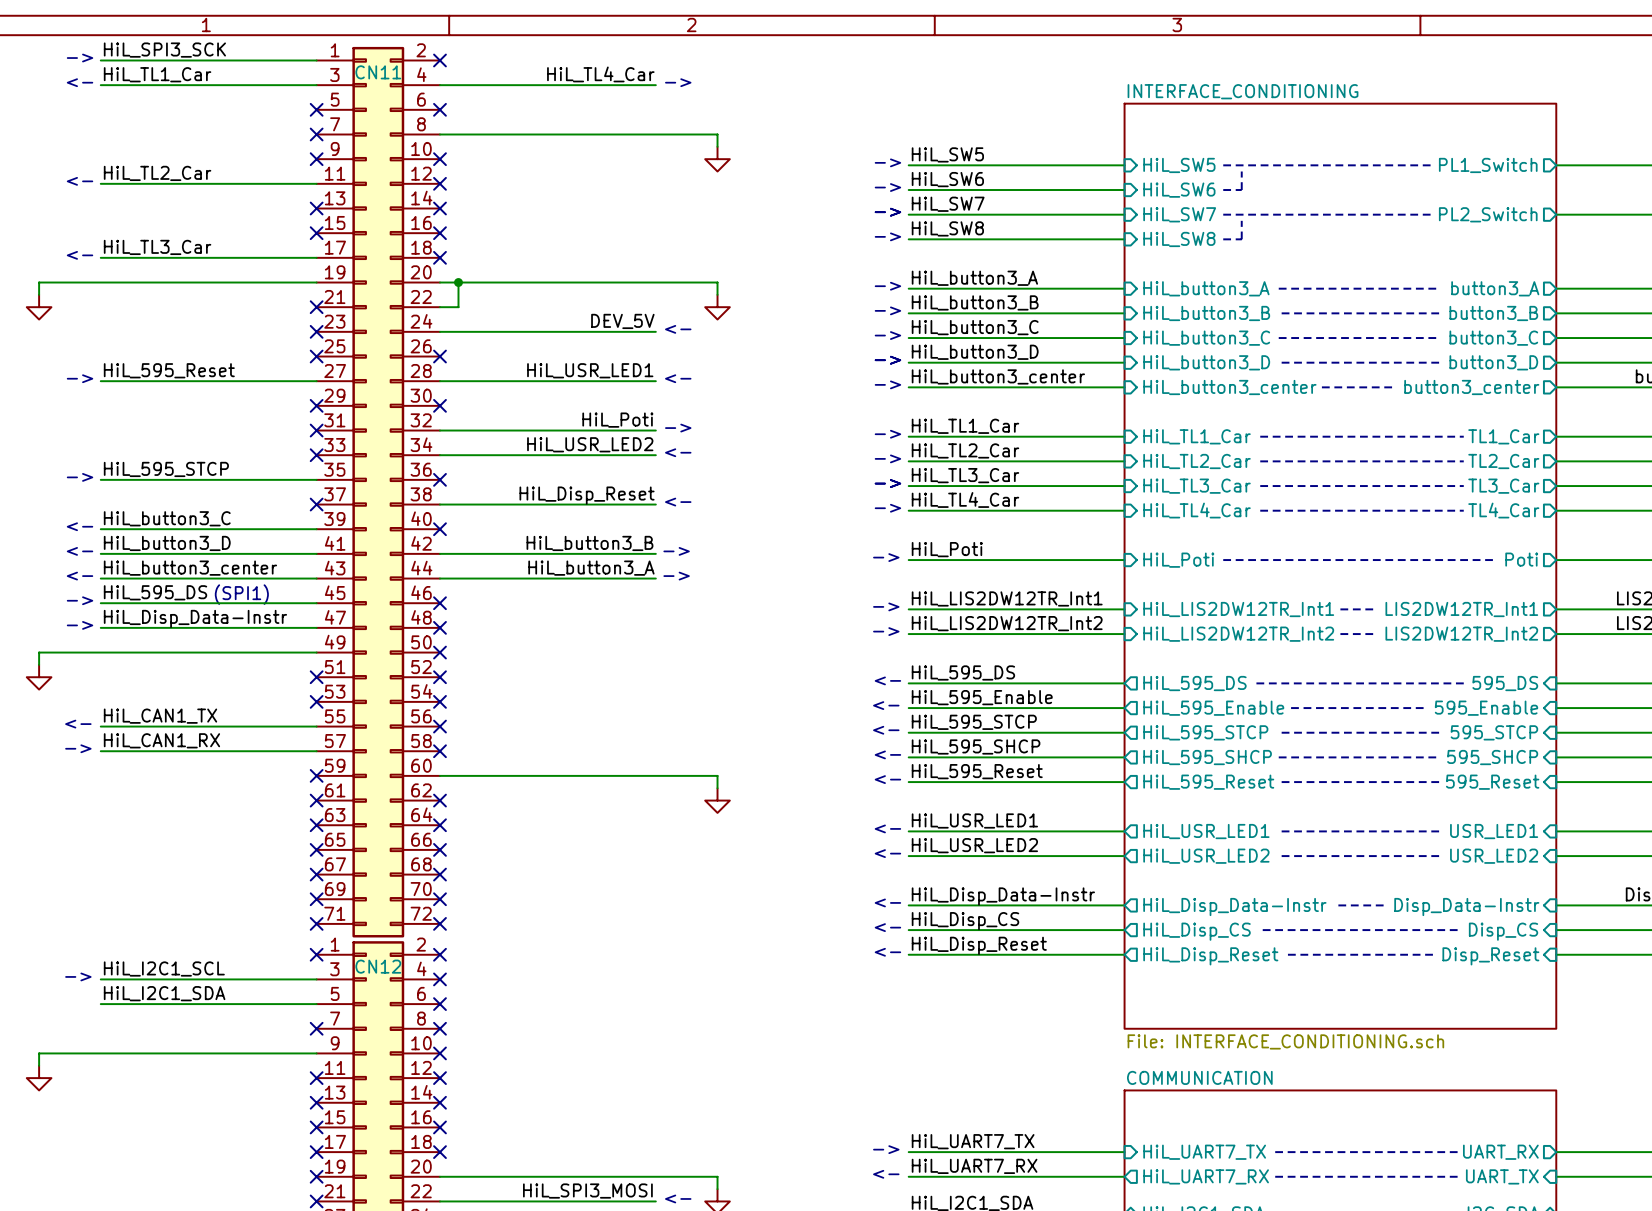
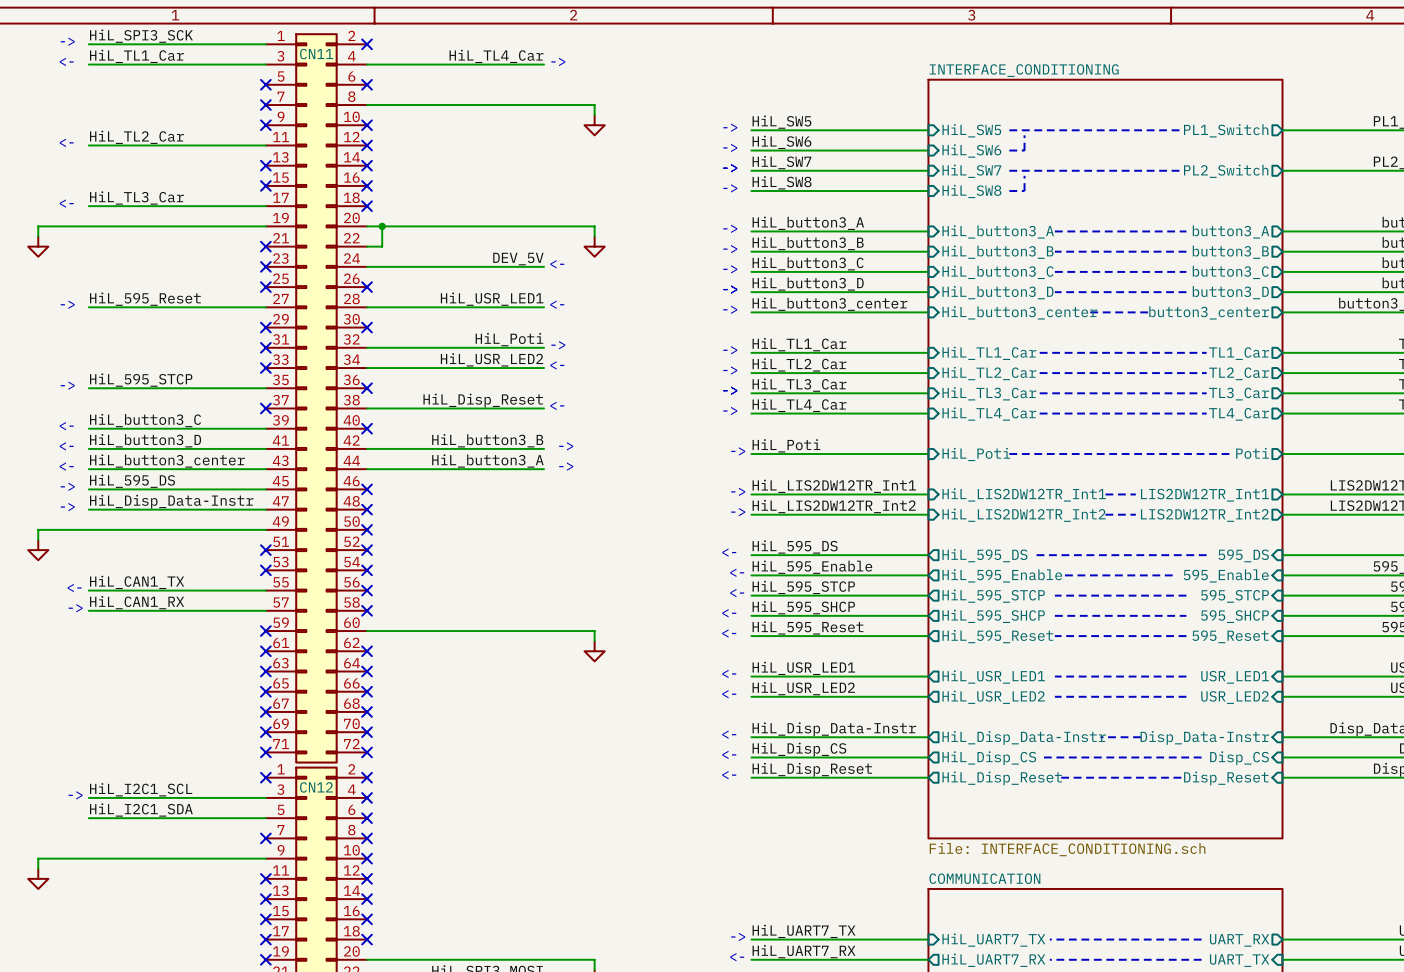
text: (SPI1) (241, 594) -> none

